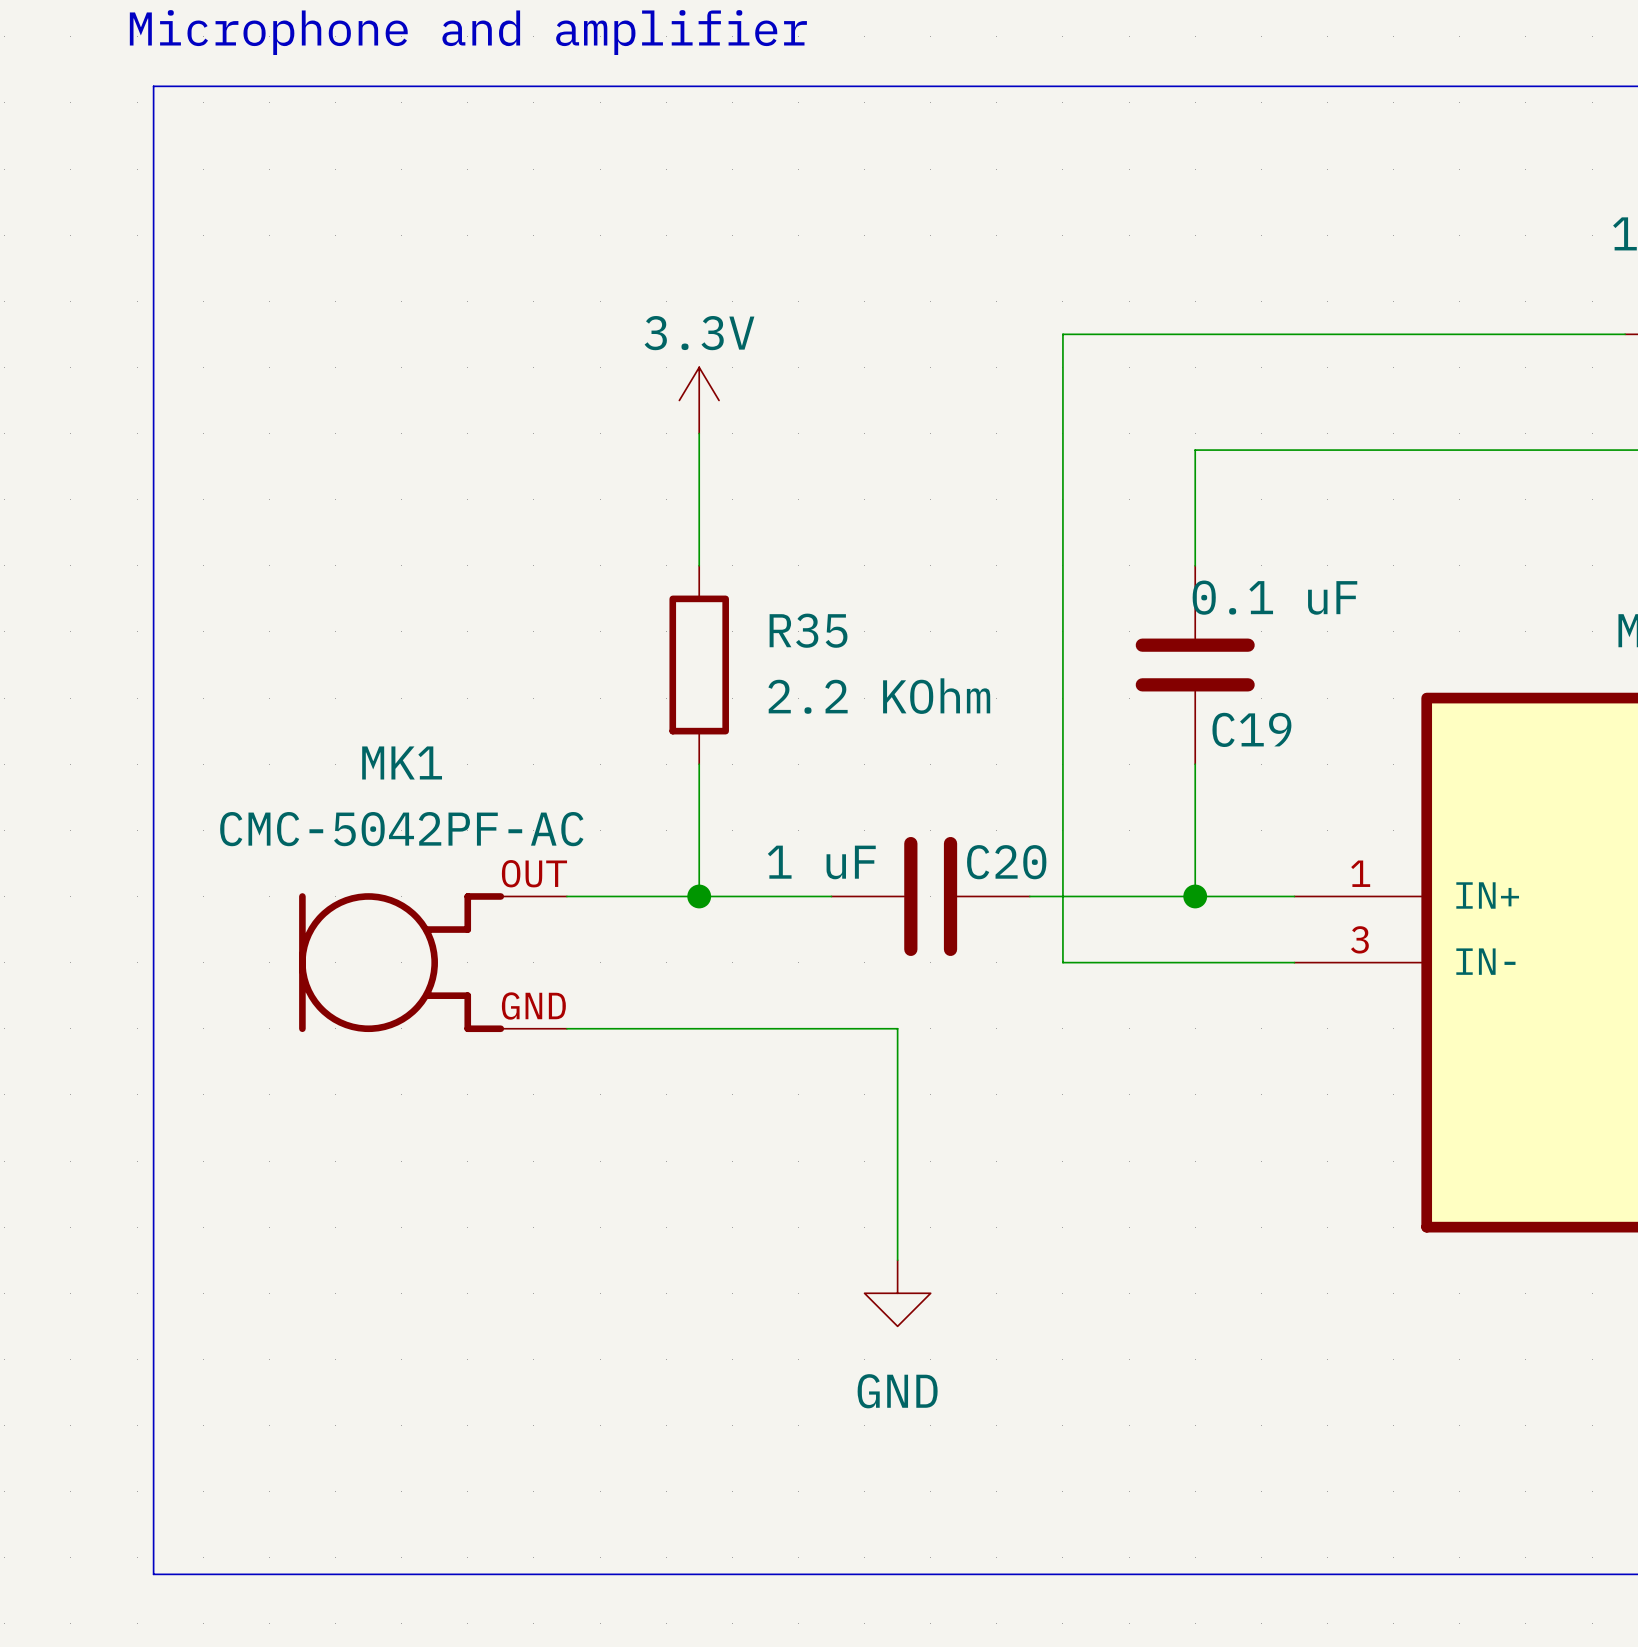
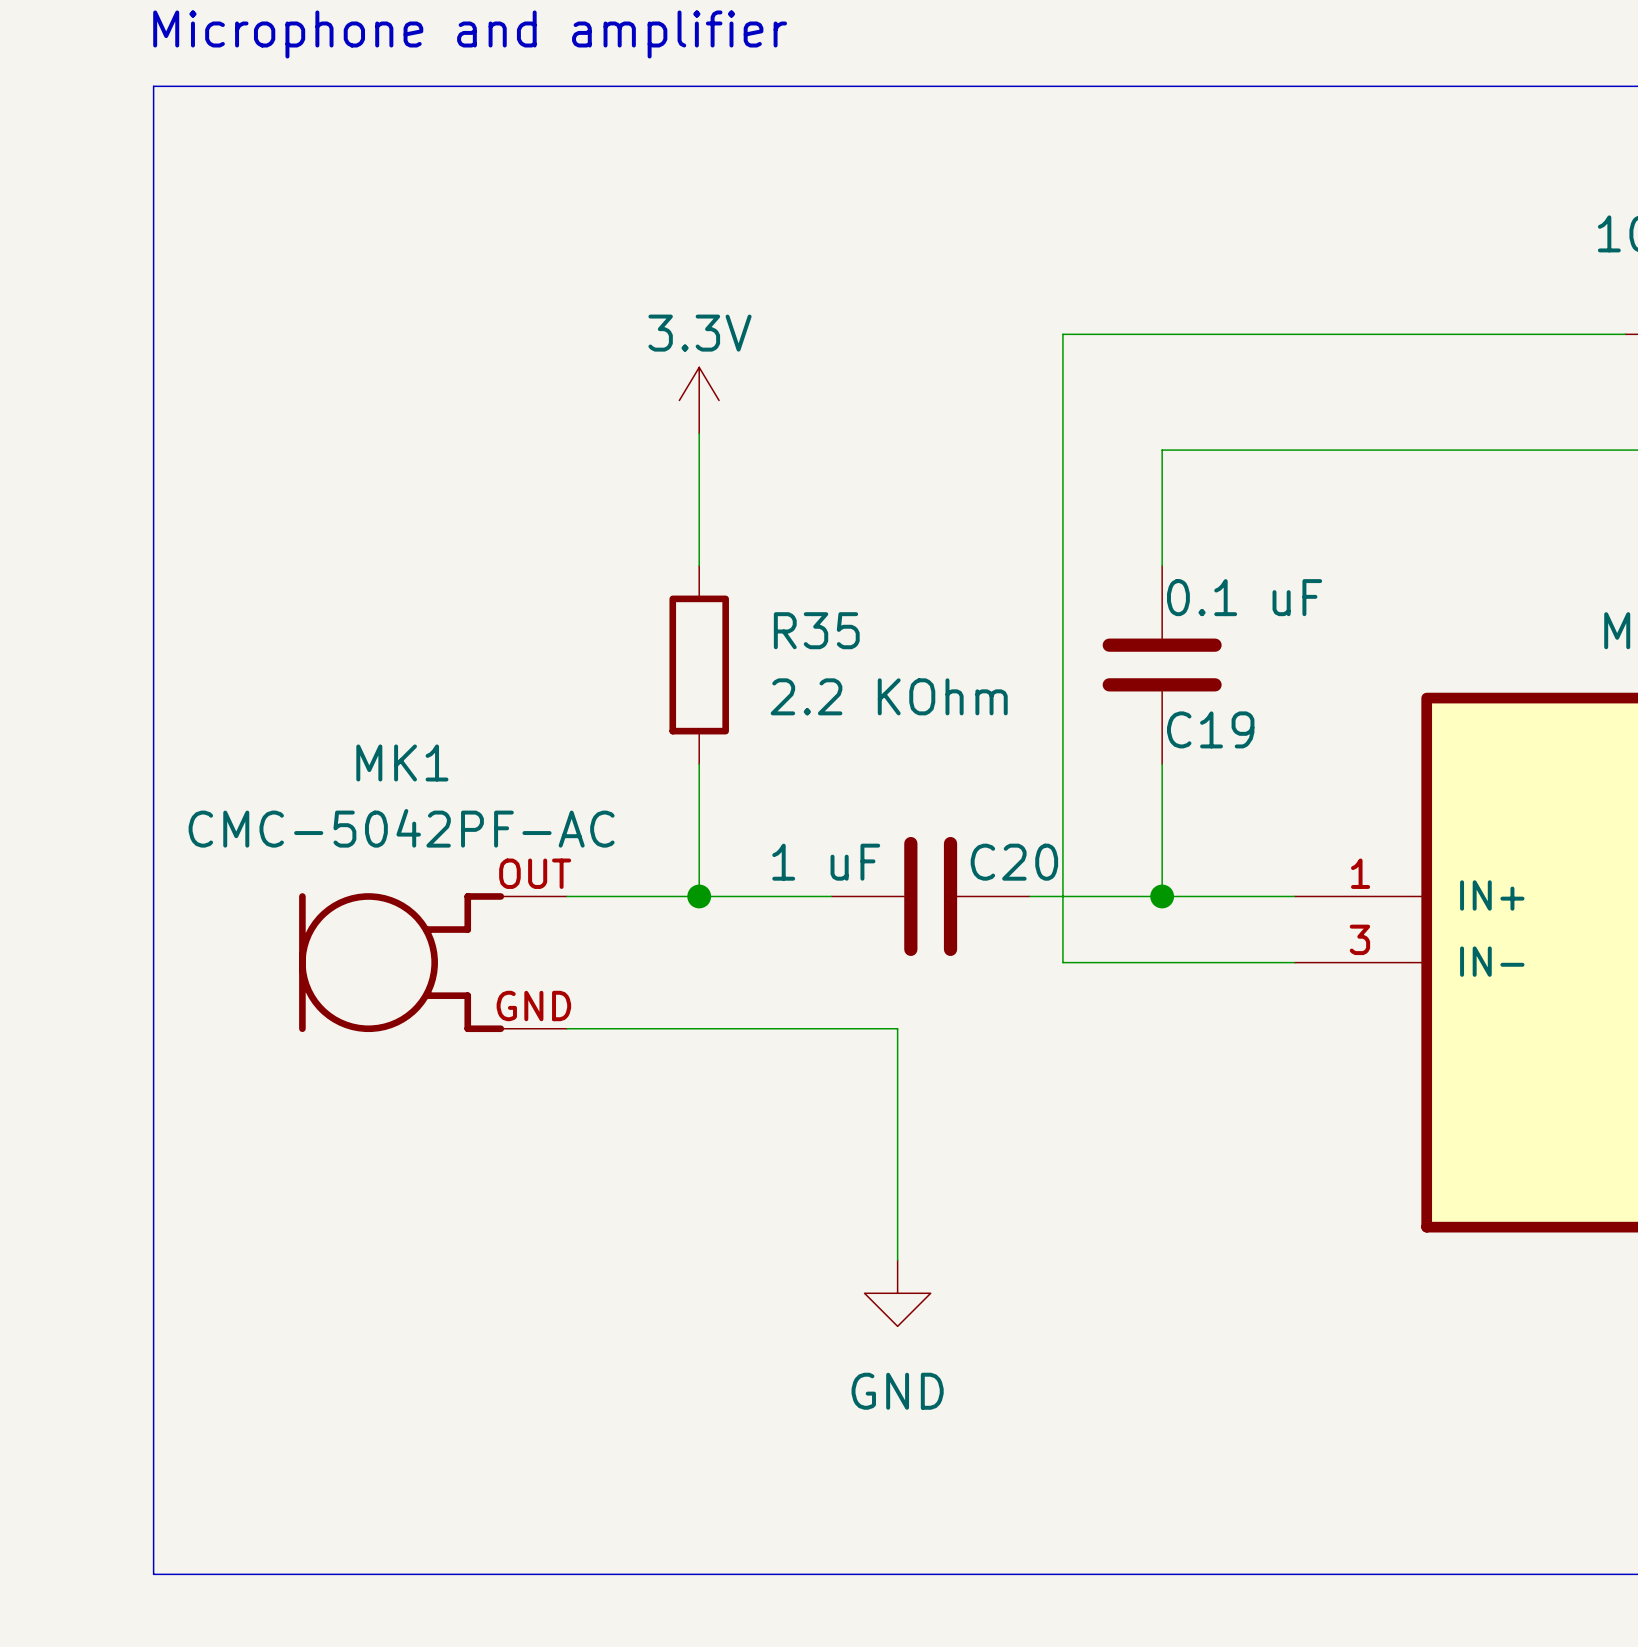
wire: (1195, 450) (1195, 565) -> (1195, 450) (1162, 450) (1162, 565)
C19 position: (1195, 665) -> (1162, 665)
wire: (1195, 764) (1195, 896) -> (1162, 764) (1162, 896)
junction position: (1195, 896) -> (1162, 896)

